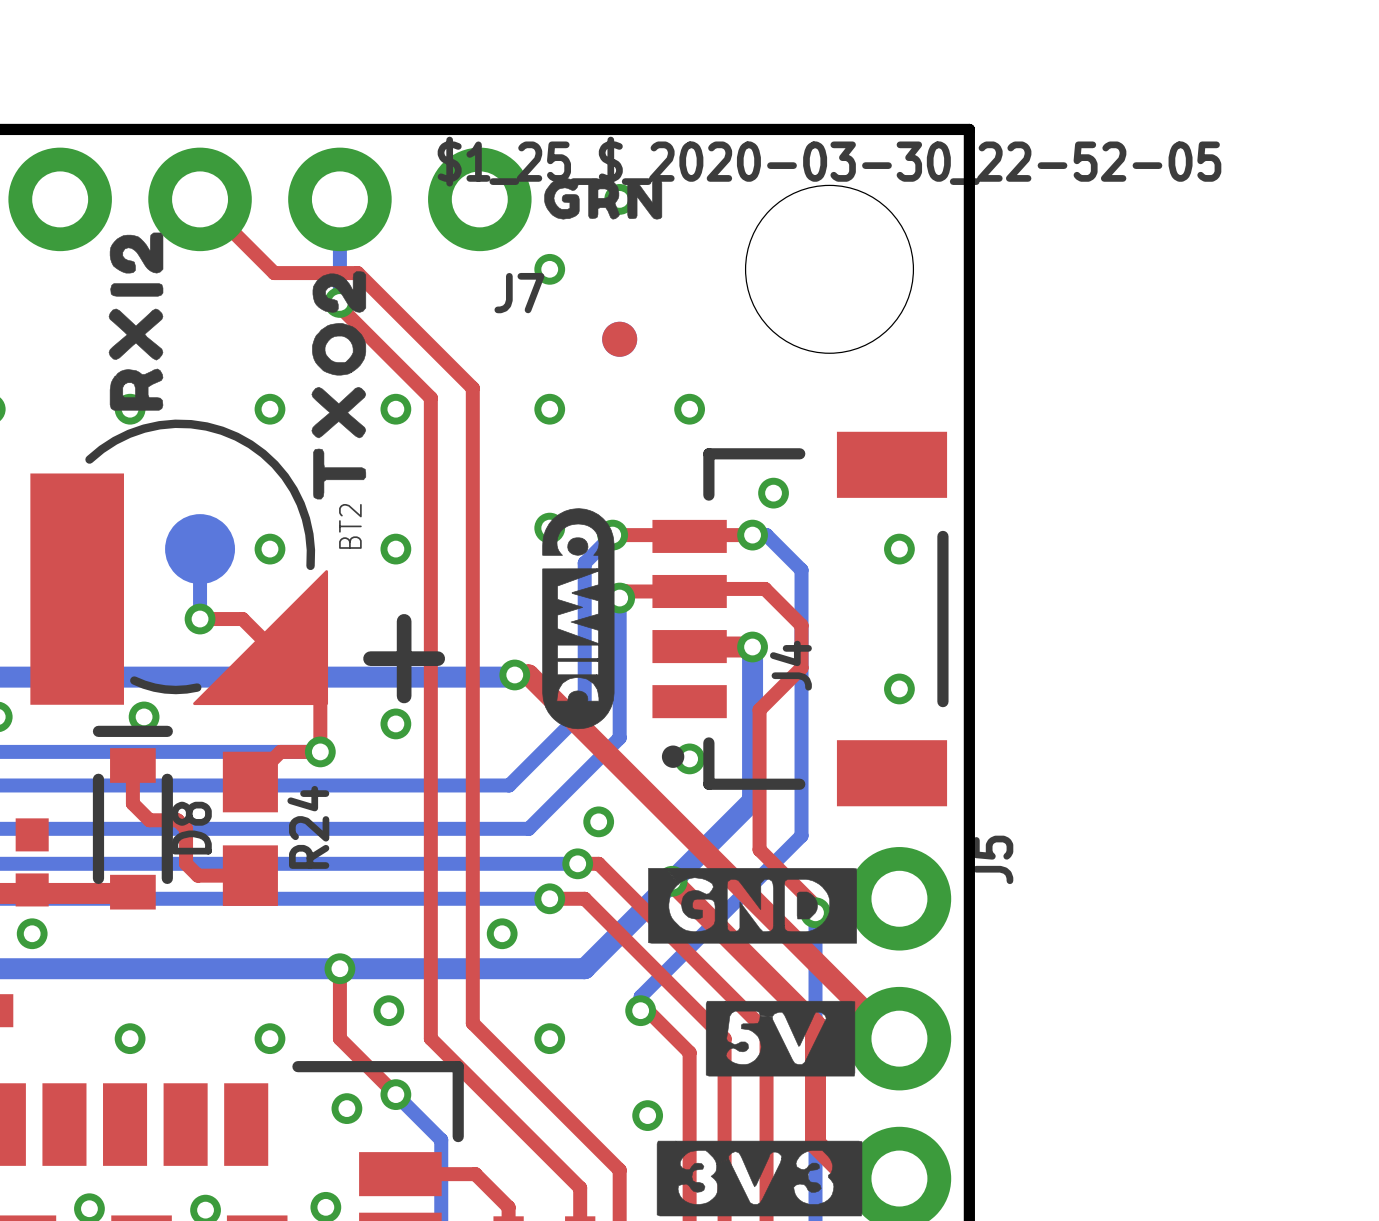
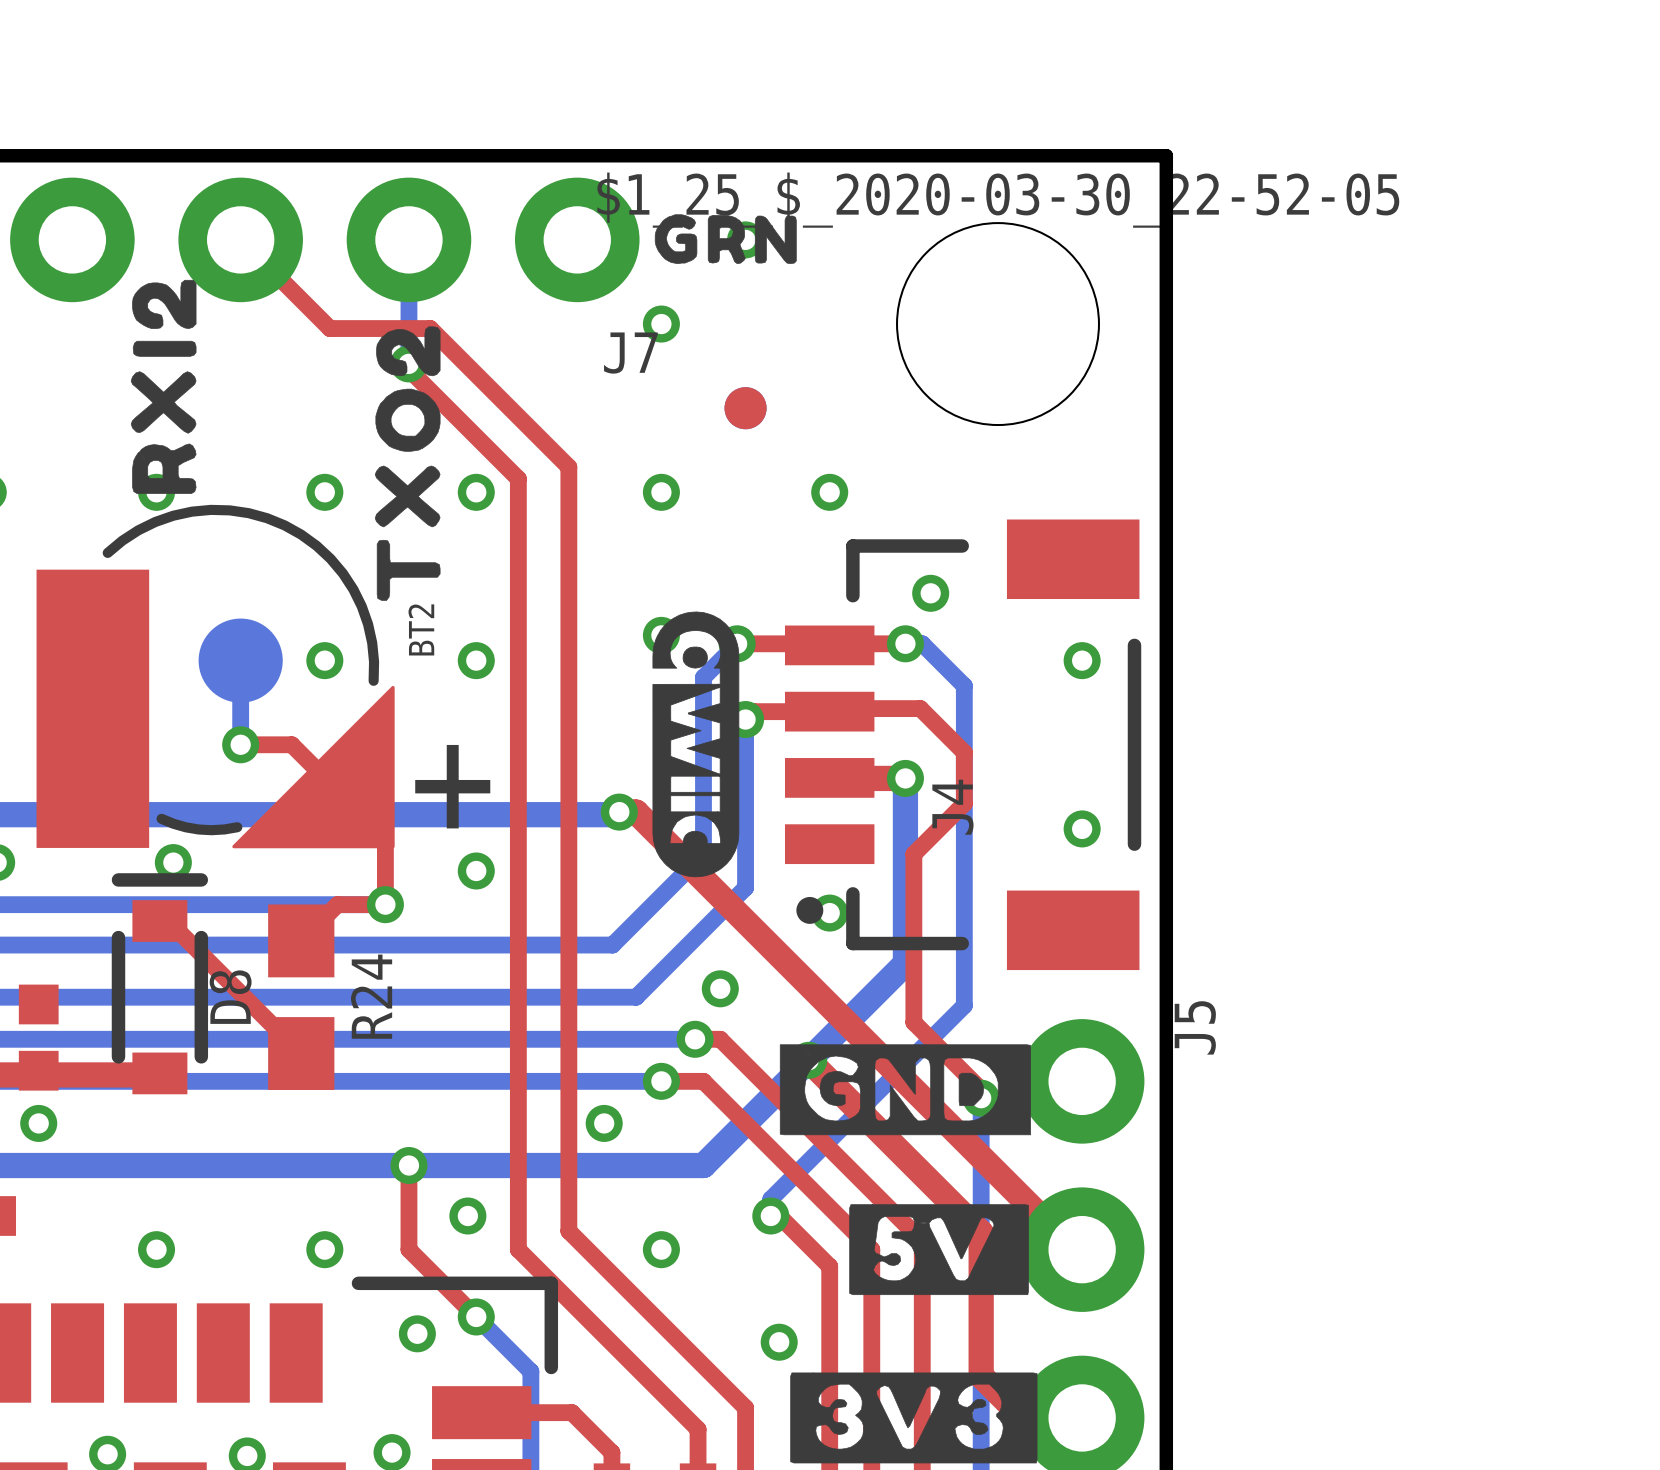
top track: (132, 765) (132, 803) (149, 820) (177, 820) (186, 828) (186, 863) (197, 875) (250, 875) -> (159, 921) (168, 921) (300, 1053)

